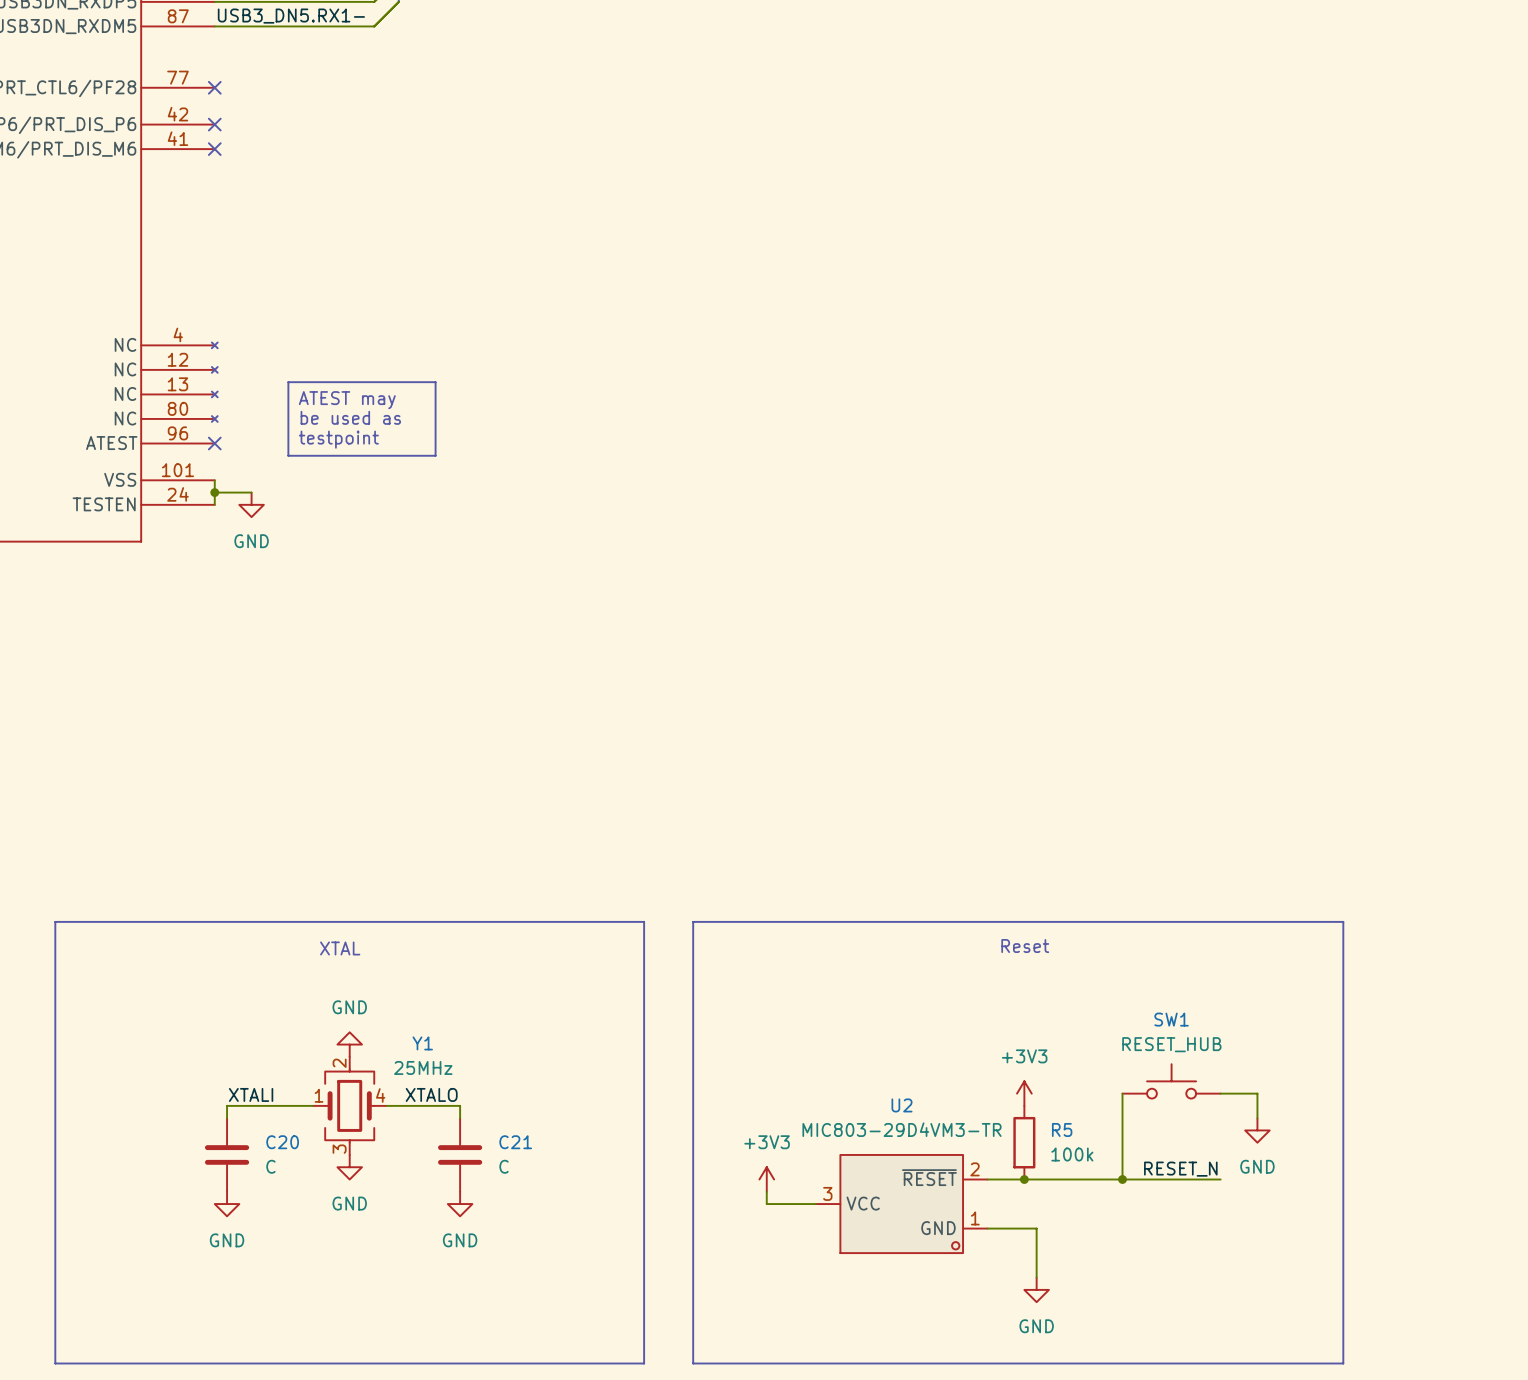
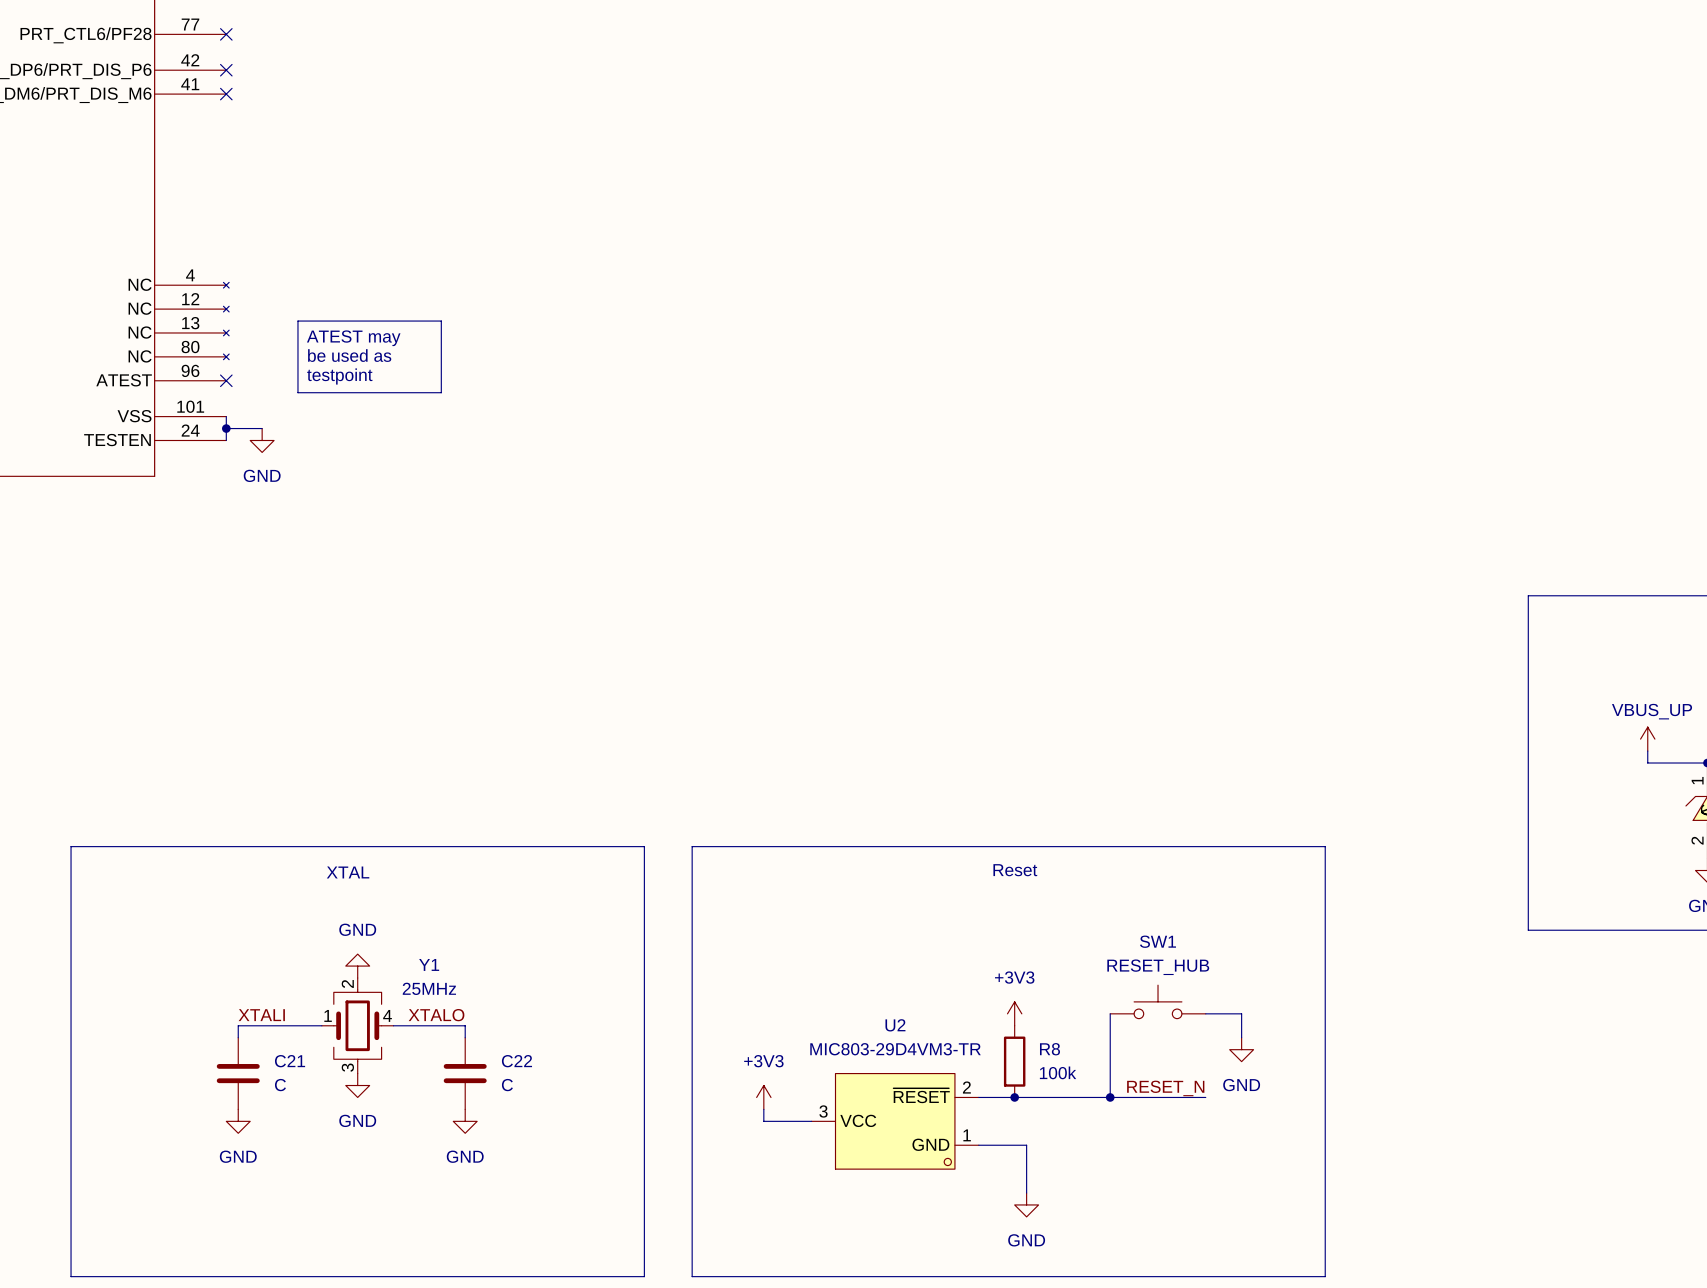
R5 name: R5 (1062, 1129) -> R8 (1049, 1049)
C20 name: C20 (282, 1142) -> C21 (290, 1061)
C21 name: C21 (515, 1142) -> C22 (516, 1061)

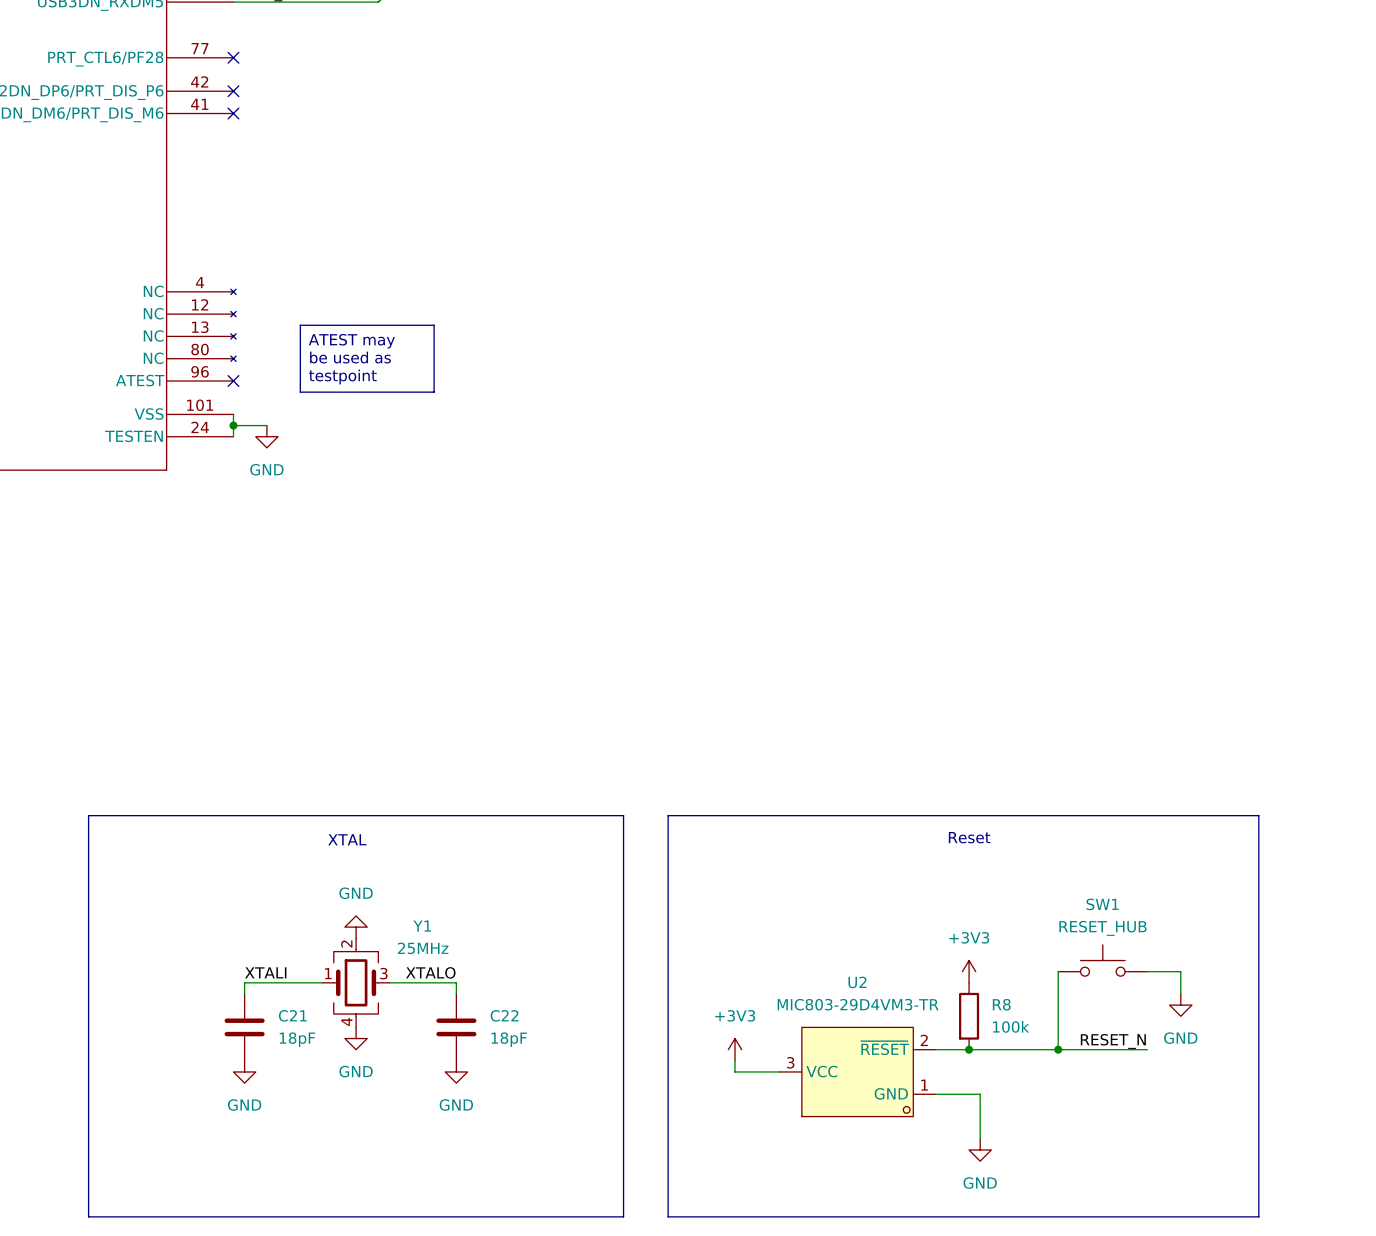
Y1 pin number: 4 (387, 1015) -> 3 (383, 973)
Y1 pin number: 3 (347, 1067) -> 4 (346, 1021)
C21 value: C (280, 1085) -> 18pF (297, 1039)
C22 value: C (507, 1085) -> 18pF (509, 1039)

